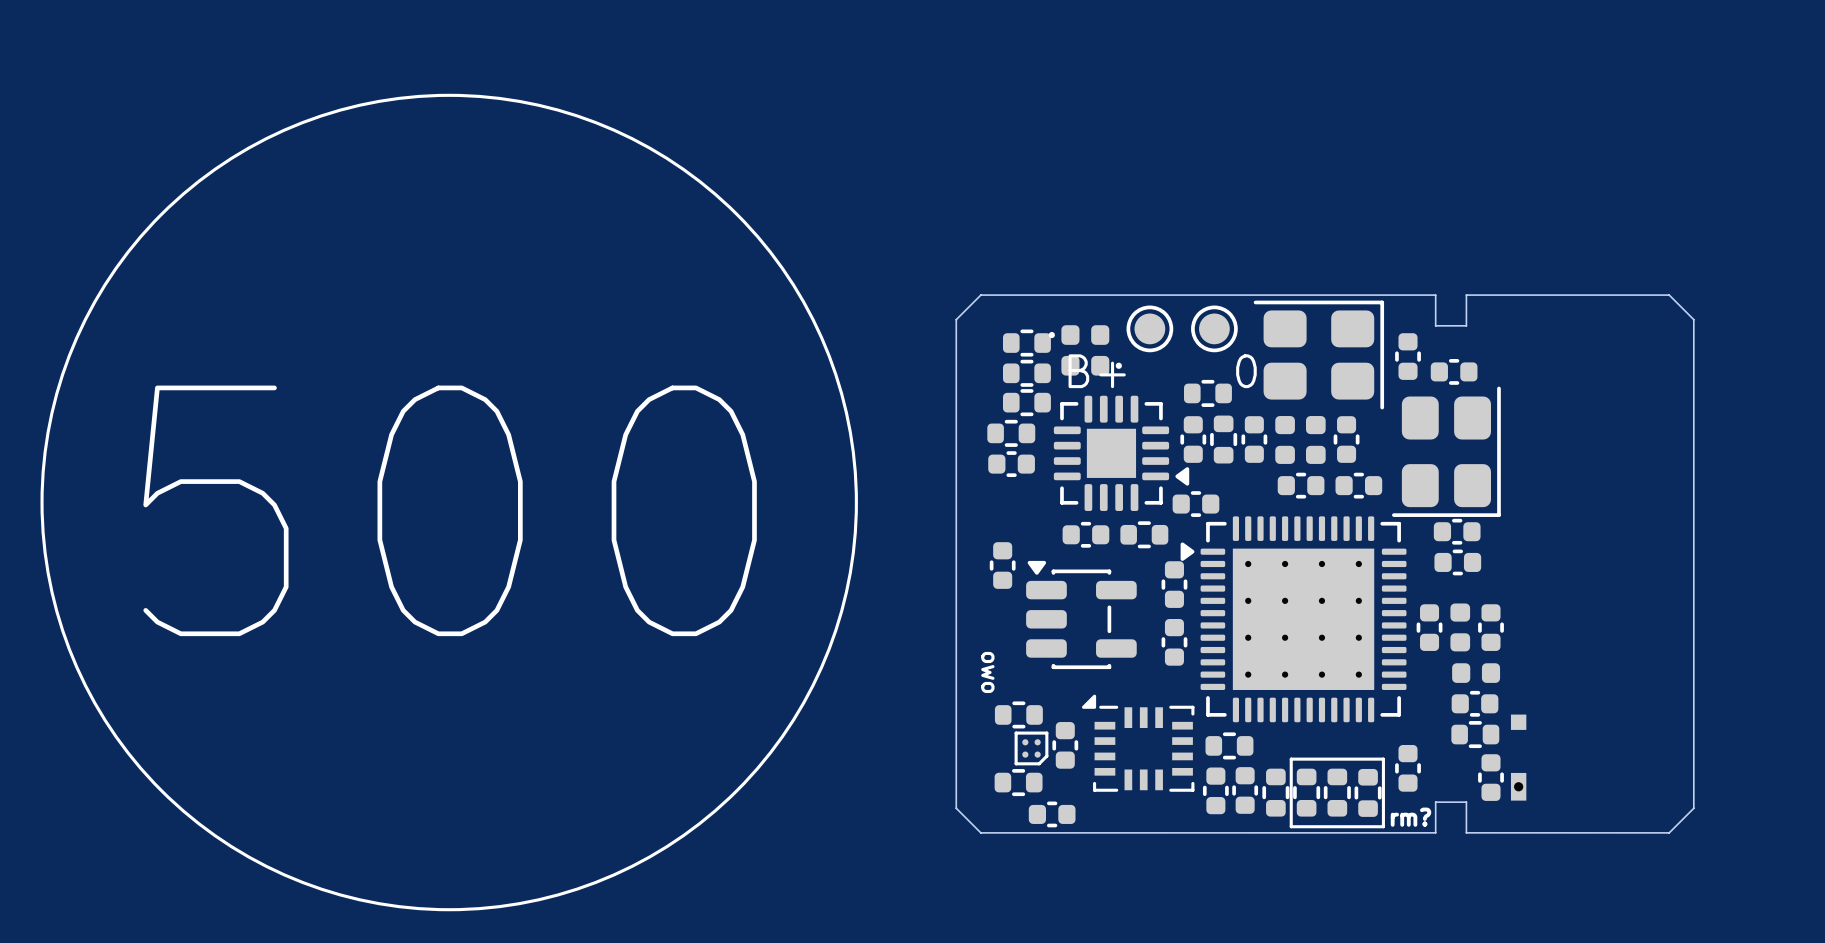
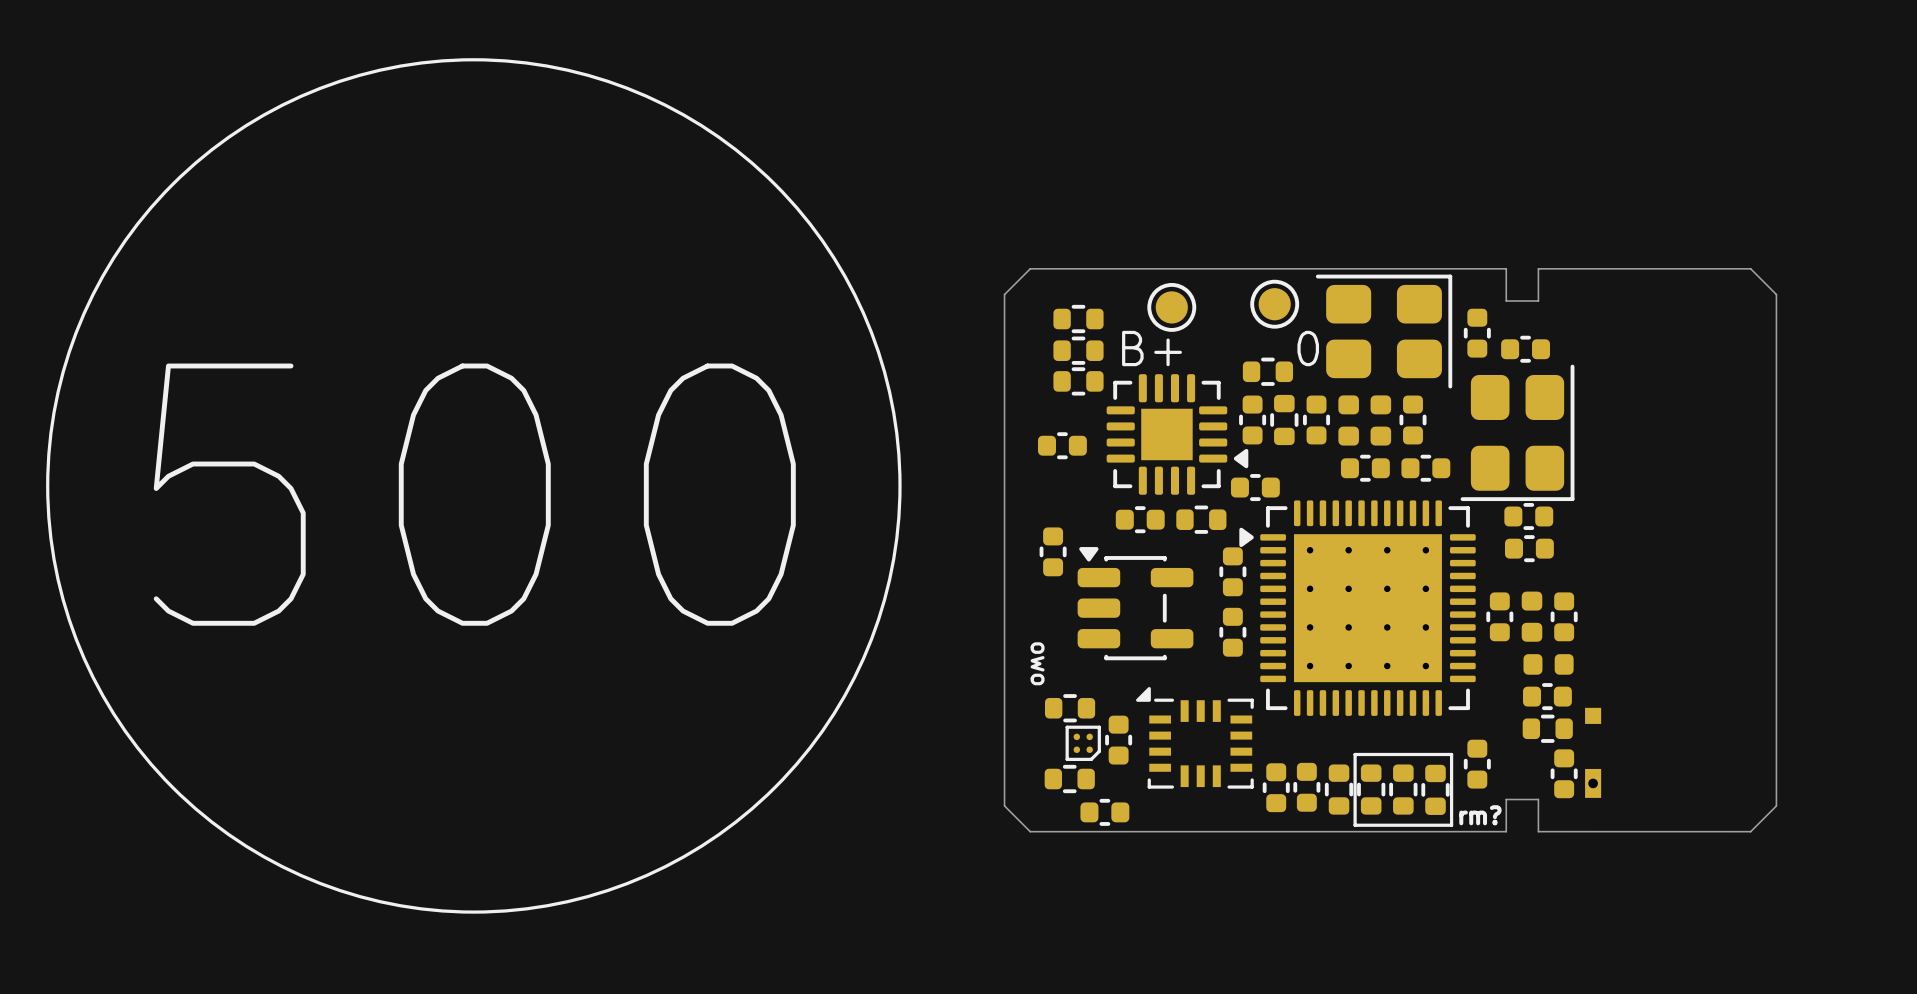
part position: (1149, 328) -> (1171, 307)
part: (1079, 335) -> none
part: (1091, 365) -> none
part: (1011, 433) -> none
part: (1229, 745) -> none

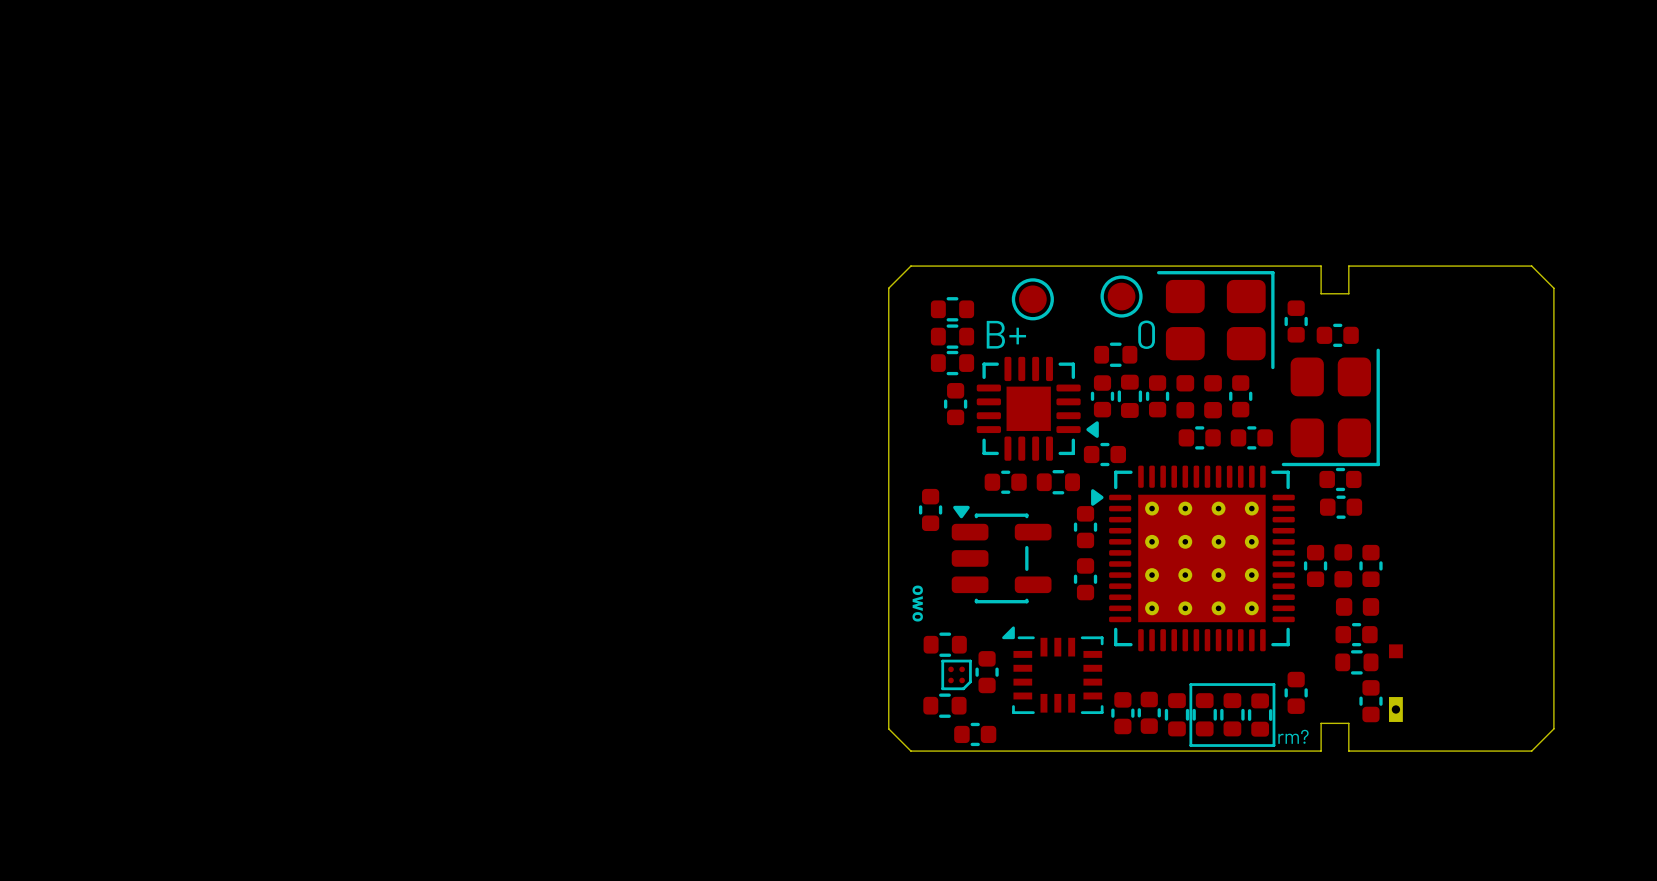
drawing: [46, 58, 902, 914] -> none
part rotation: 0° (1062, 445) -> 90° clockwise (955, 404)
text: 500 (474, 494) -> none

